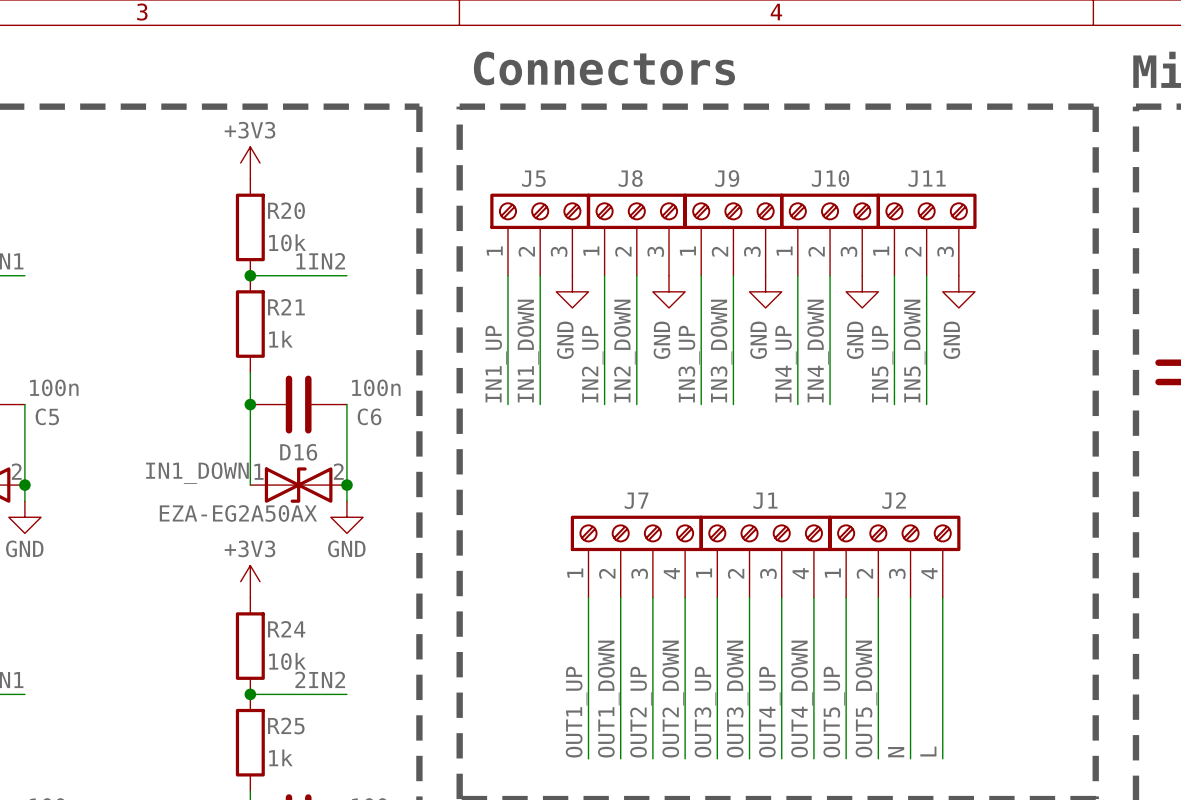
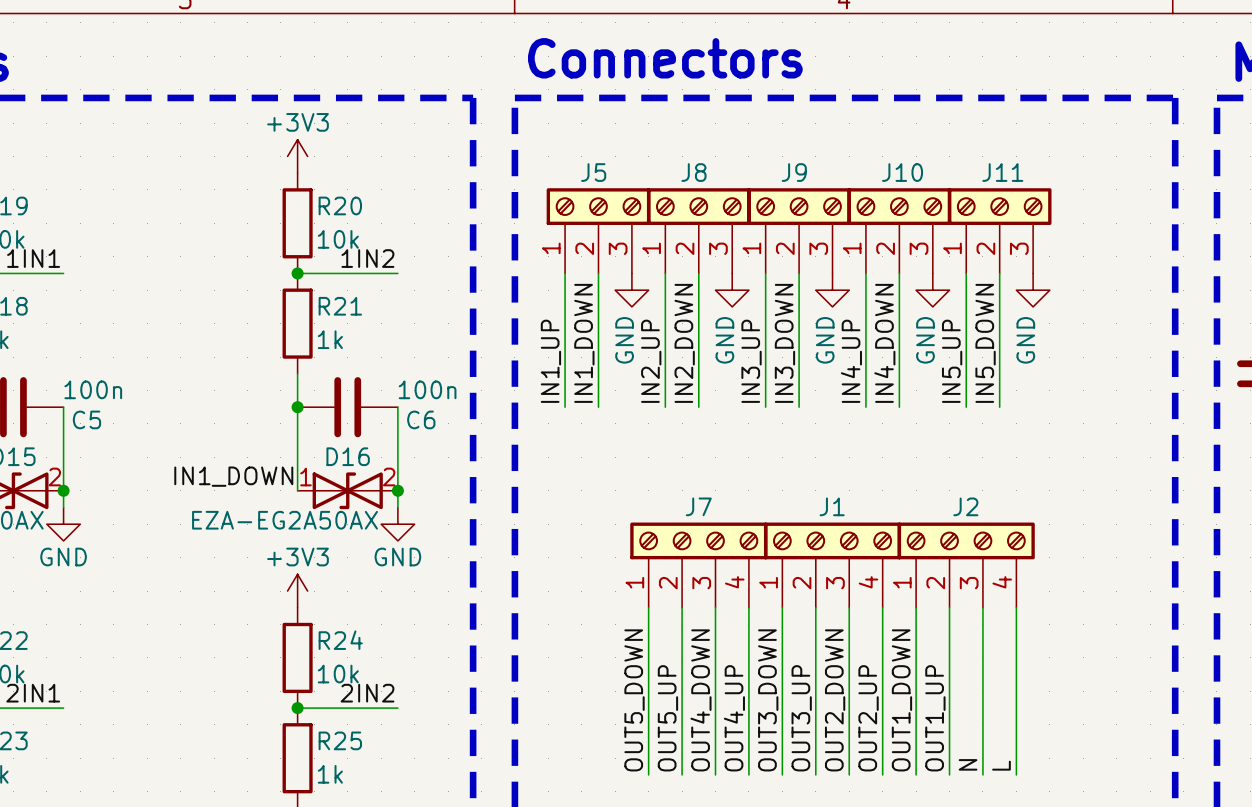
label: OUT1_DOWN (608, 699) -> OUT5_UP (667, 718)
label: OUT2_DOWN (673, 699) -> OUT4_UP (734, 718)
label: OUT3_DOWN (737, 699) -> OUT3_UP (801, 718)
label: OUT4_DOWN (802, 699) -> OUT2_UP (868, 718)
label: OUT5_DOWN (866, 699) -> OUT1_UP (935, 718)
label: OUT1_UP (576, 712) -> OUT5_DOWN (634, 700)
label: OUT2_UP (640, 712) -> OUT4_DOWN (700, 700)
label: OUT3_UP (705, 712) -> OUT3_DOWN (768, 700)
label: OUT4_UP (769, 712) -> OUT2_DOWN (835, 700)
label: OUT5_UP (834, 712) -> OUT1_DOWN (901, 700)

